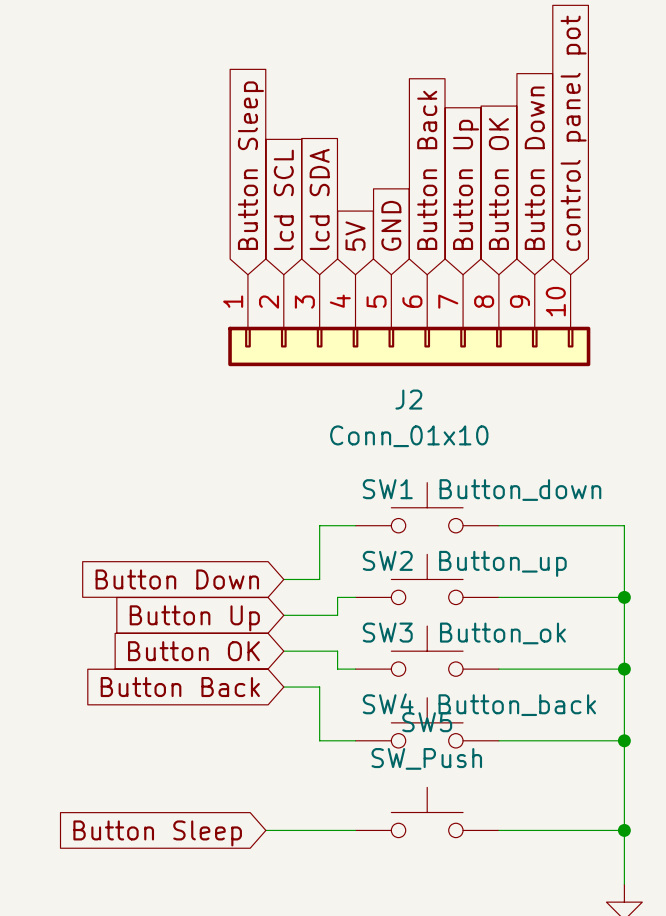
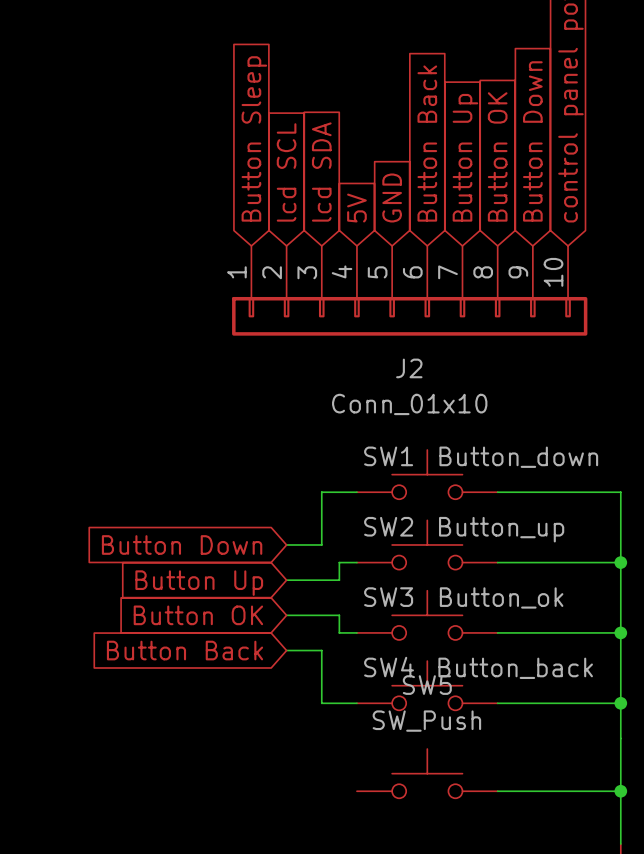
wire: (265, 830) (355, 830) -> none
global label: Button Sleep (157, 833) -> none

